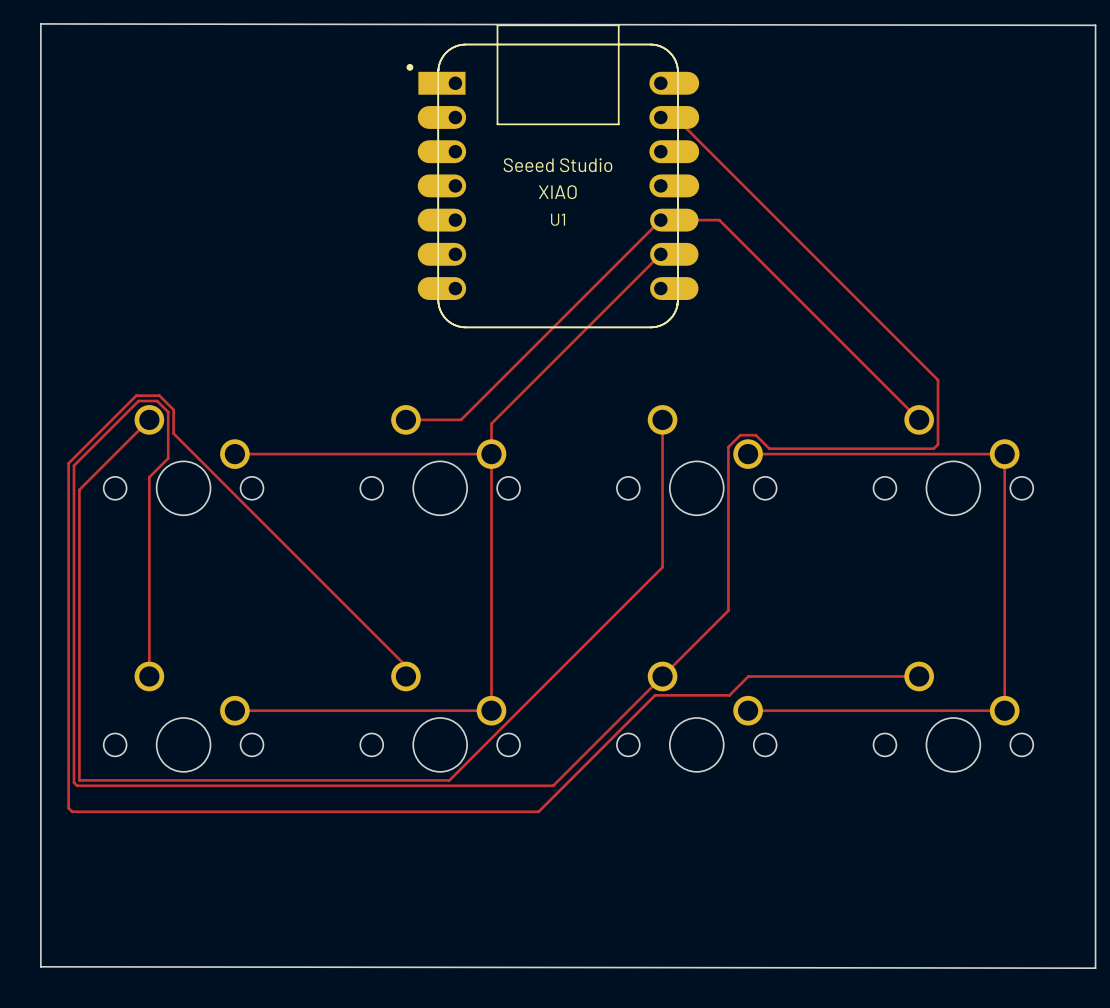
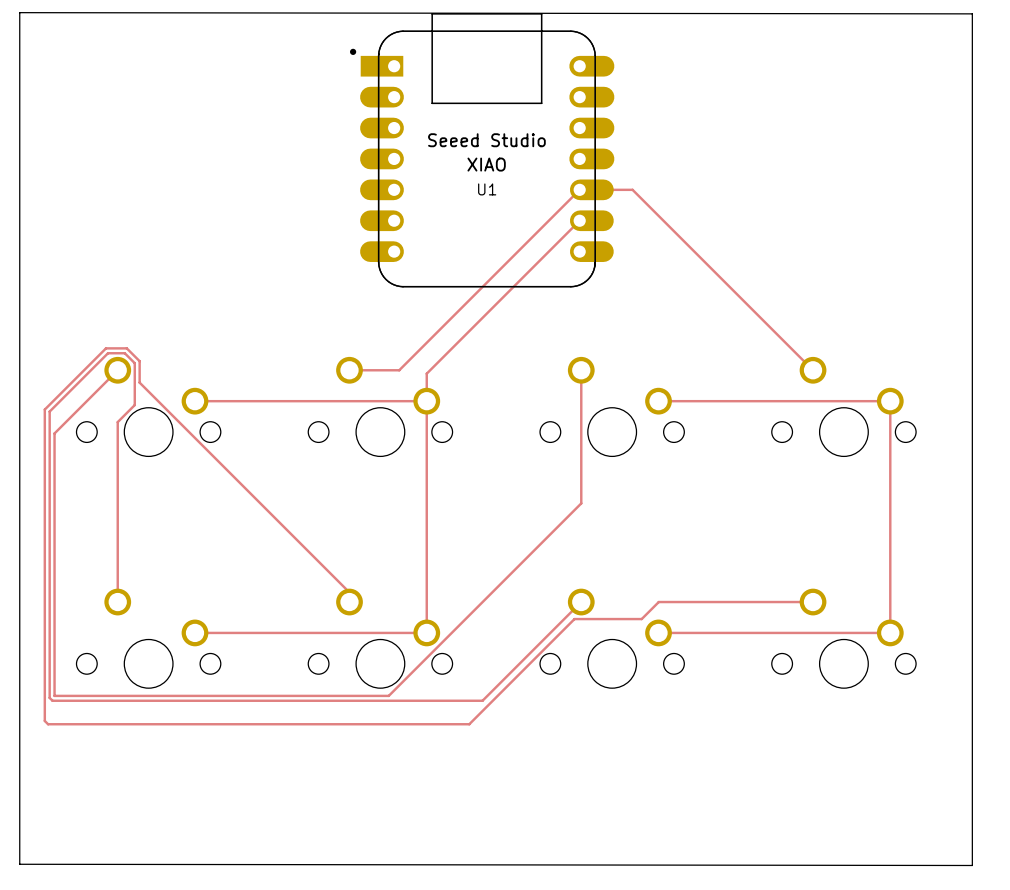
top track: (660, 117) (675, 117) (938, 380) (938, 444) (933, 448) (769, 448) (755, 435) (740, 435) (728, 447) (728, 610) (662, 676) -> none

